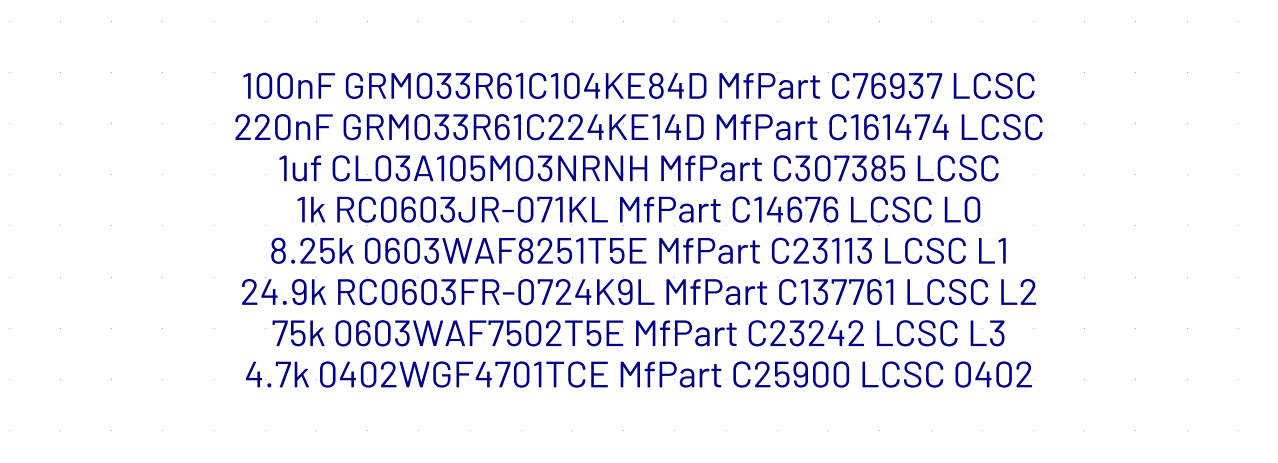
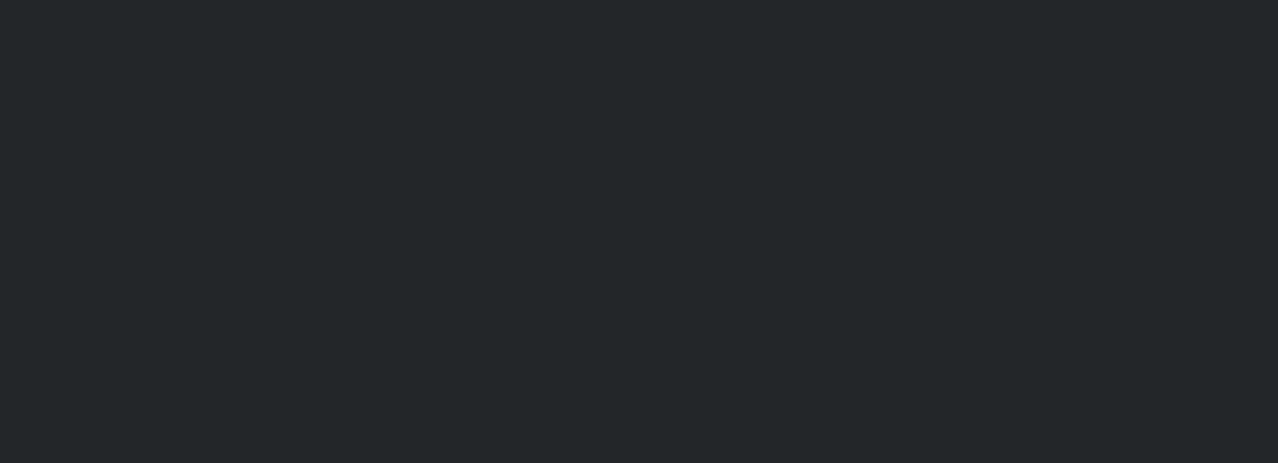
text: 100nF GRM033R61C104KE84D MfPart C76937 LCSC (638, 85) -> none
text: 220nF GRM033R61C224KE14D MfPart C161474 LCSC (638, 127) -> none
text: 1uf CL03A105MO3NRNH MfPart C307385 LCSC (638, 168) -> none
text: 1k RC0603JR-071KL MfPart C14676 LCSC L0 (638, 209) -> none
text: 8.25k 0603WAF8251T5E MfPart C23113 LCSC L1 (638, 250) -> none
text: 24.9k RC0603FR-0724K9L MfPart C137761 LCSC L2 (639, 292) -> none
text: 75k 0603WAF7502T5E MfPart C23242 LCSC L3 (638, 333) -> none
text: 4.7k 0402WGF4701TCE MfPart C25900 LCSC 0402 (638, 374) -> none

